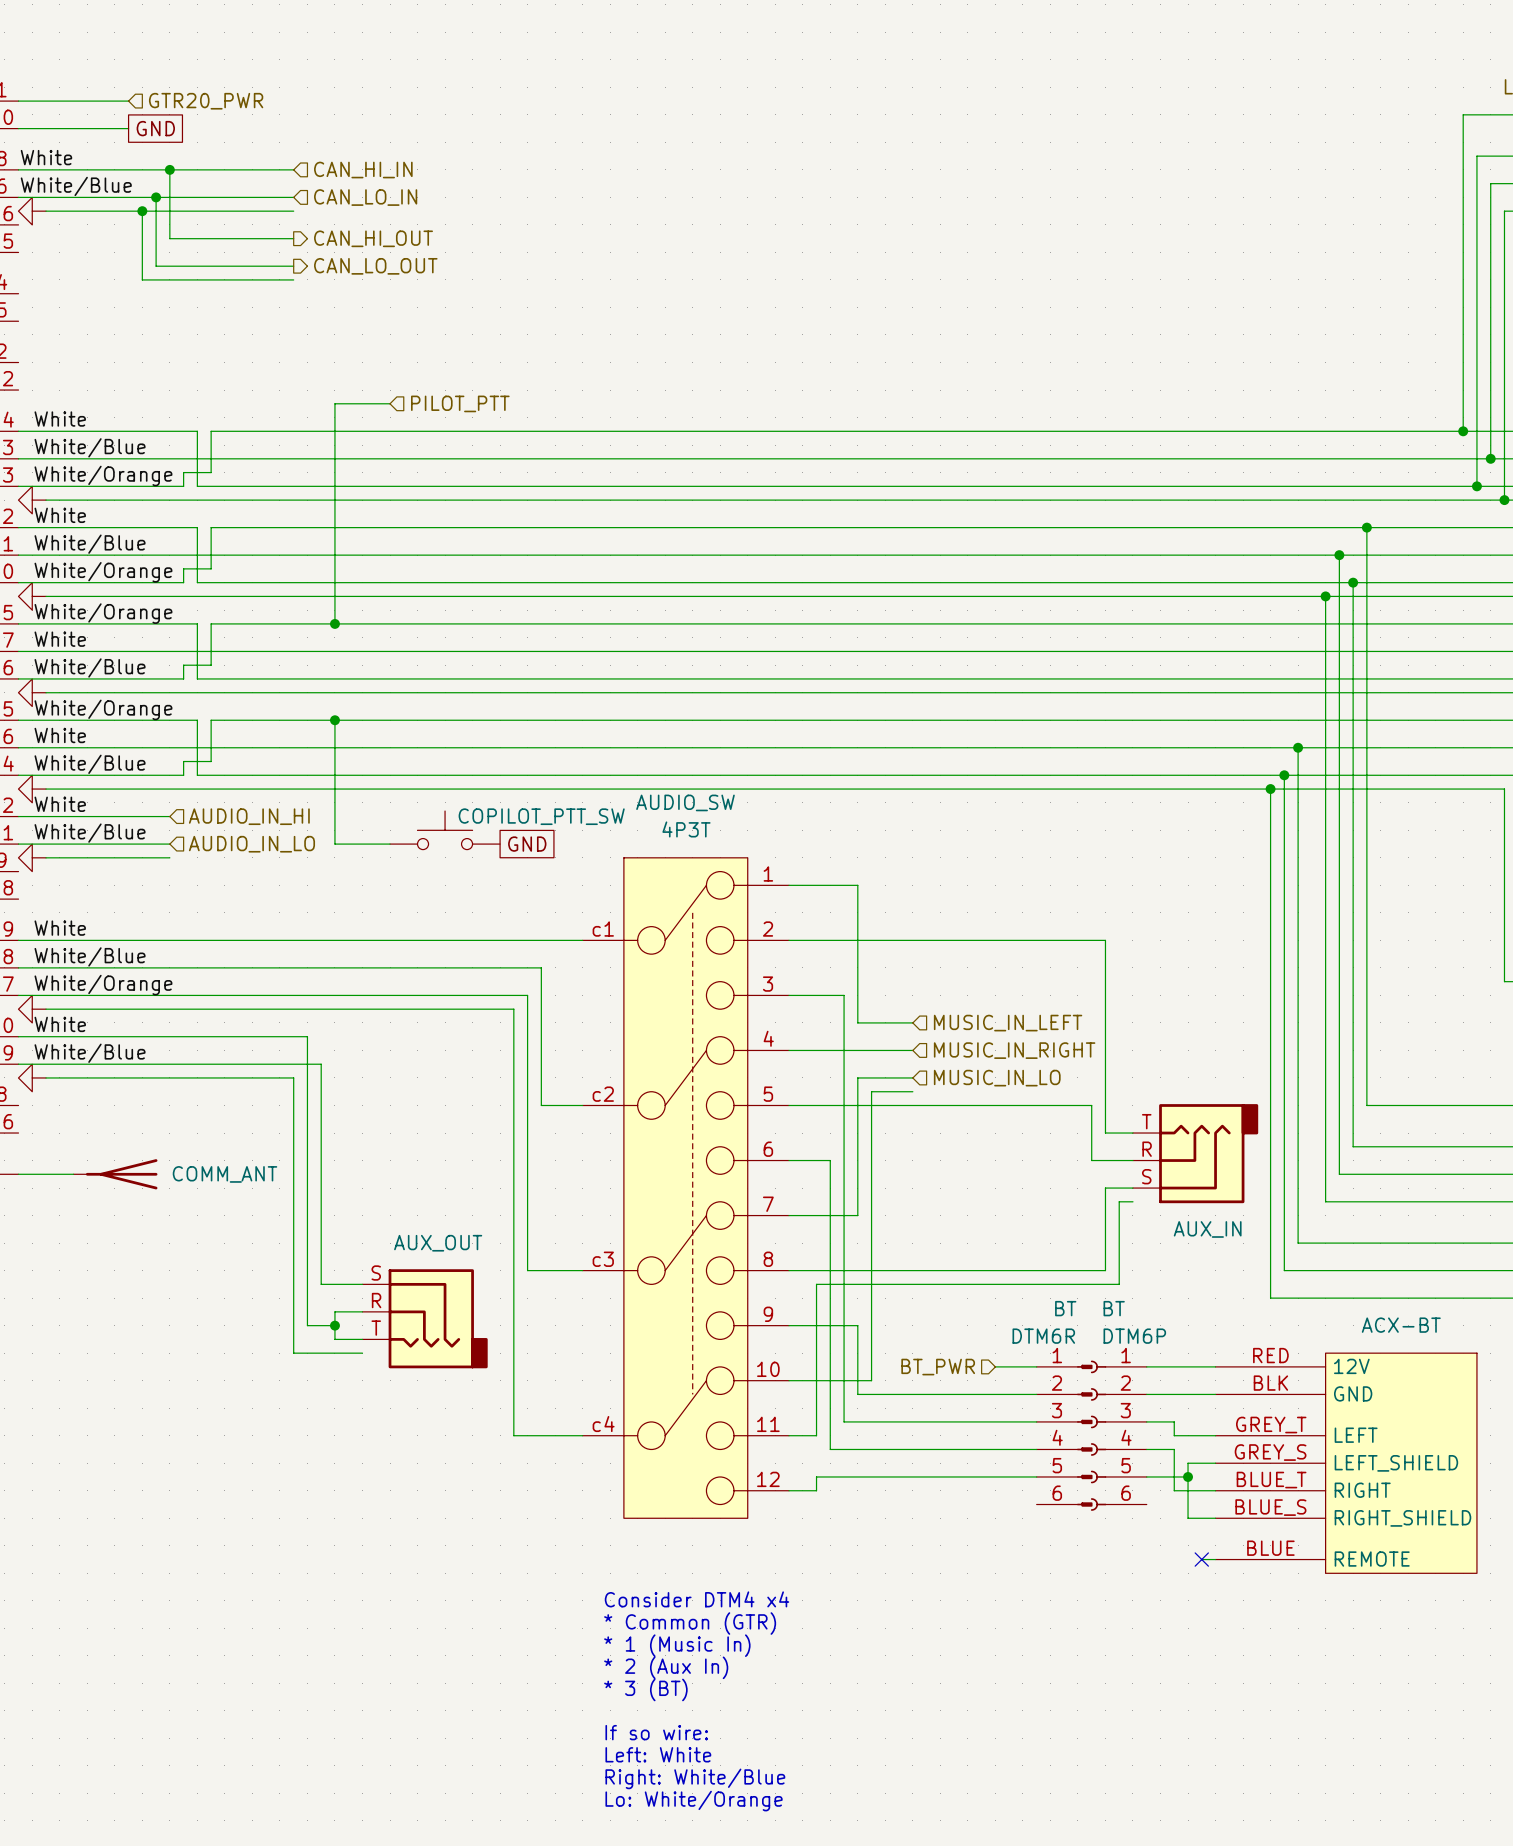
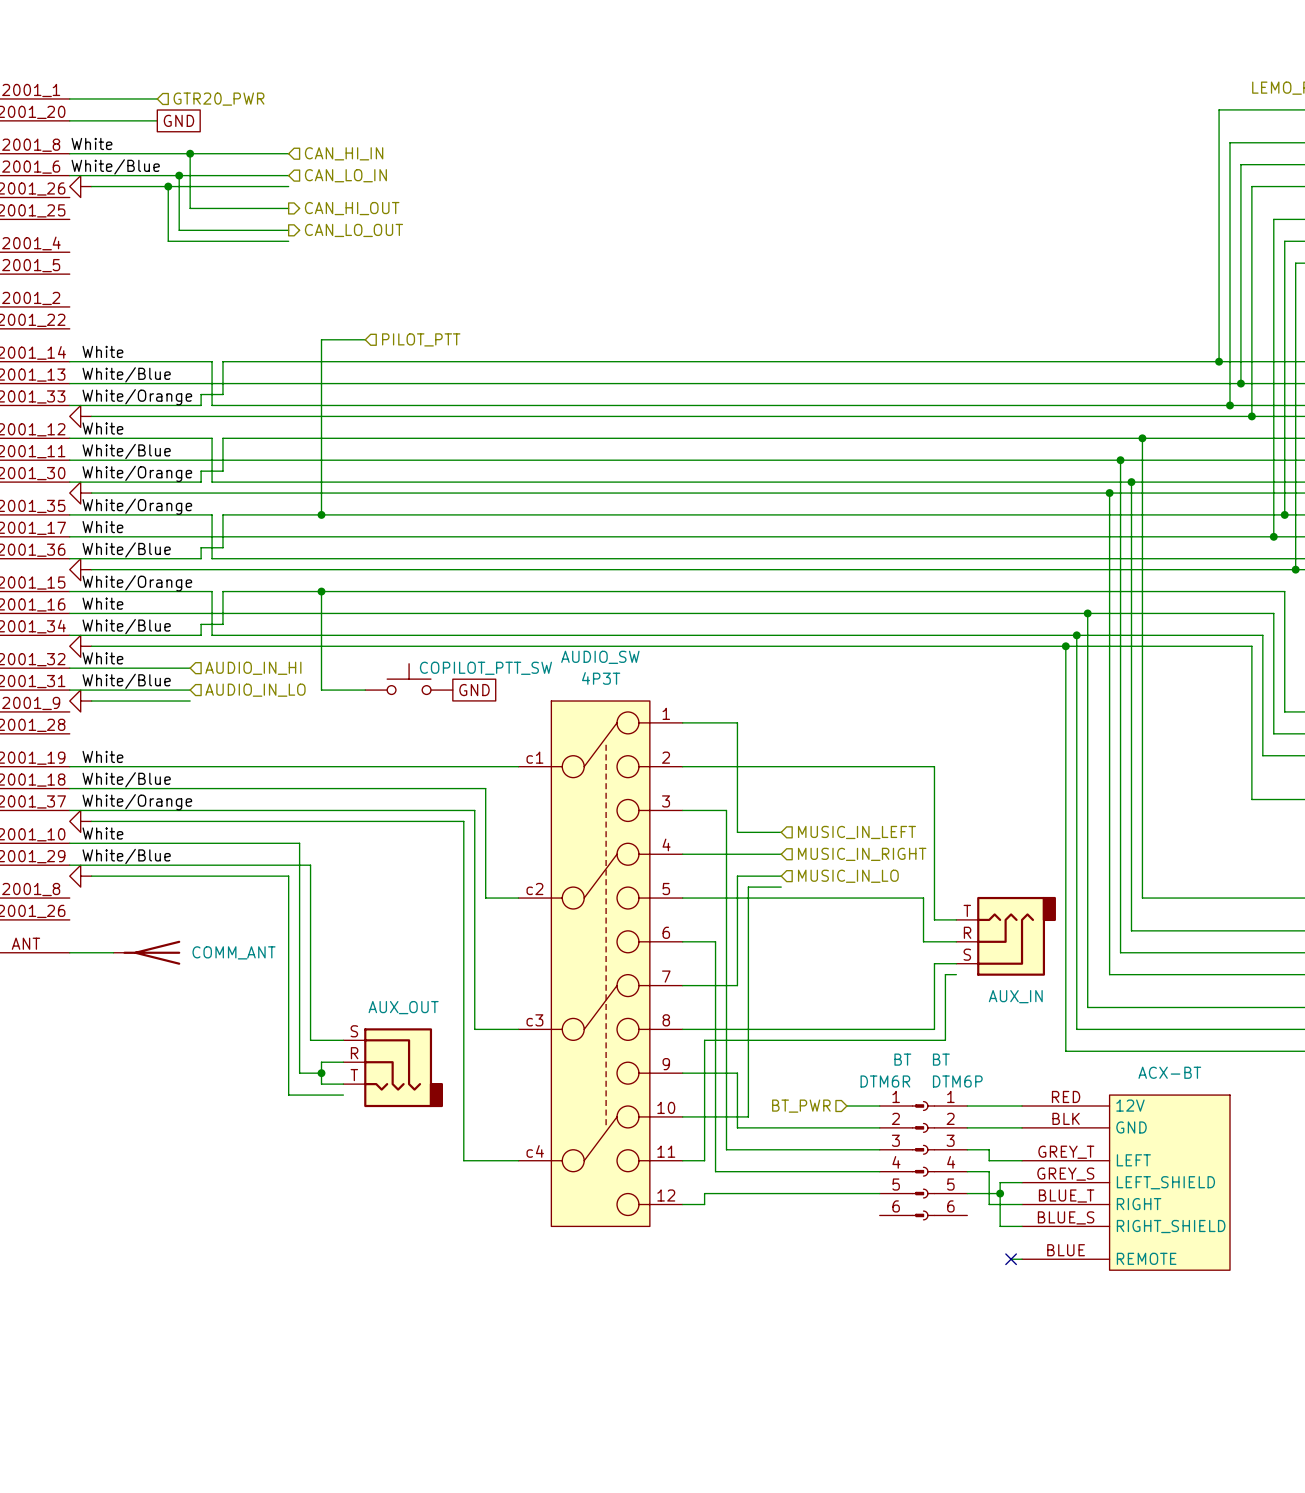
text: Consider DTM4 x4 (696, 1599) -> none
text: * Common (GTR) (690, 1623) -> none
text: * 1 (Music In) (677, 1645) -> none
text: * 2 (Aux In) (666, 1667) -> none
text: * 3 (BT) (645, 1689) -> none
text: If so wire: (656, 1732) -> none
text: Left: White (658, 1754) -> none
text: Right: White/Blue (695, 1778) -> none
text: Lo: White/Orange (694, 1801) -> none

